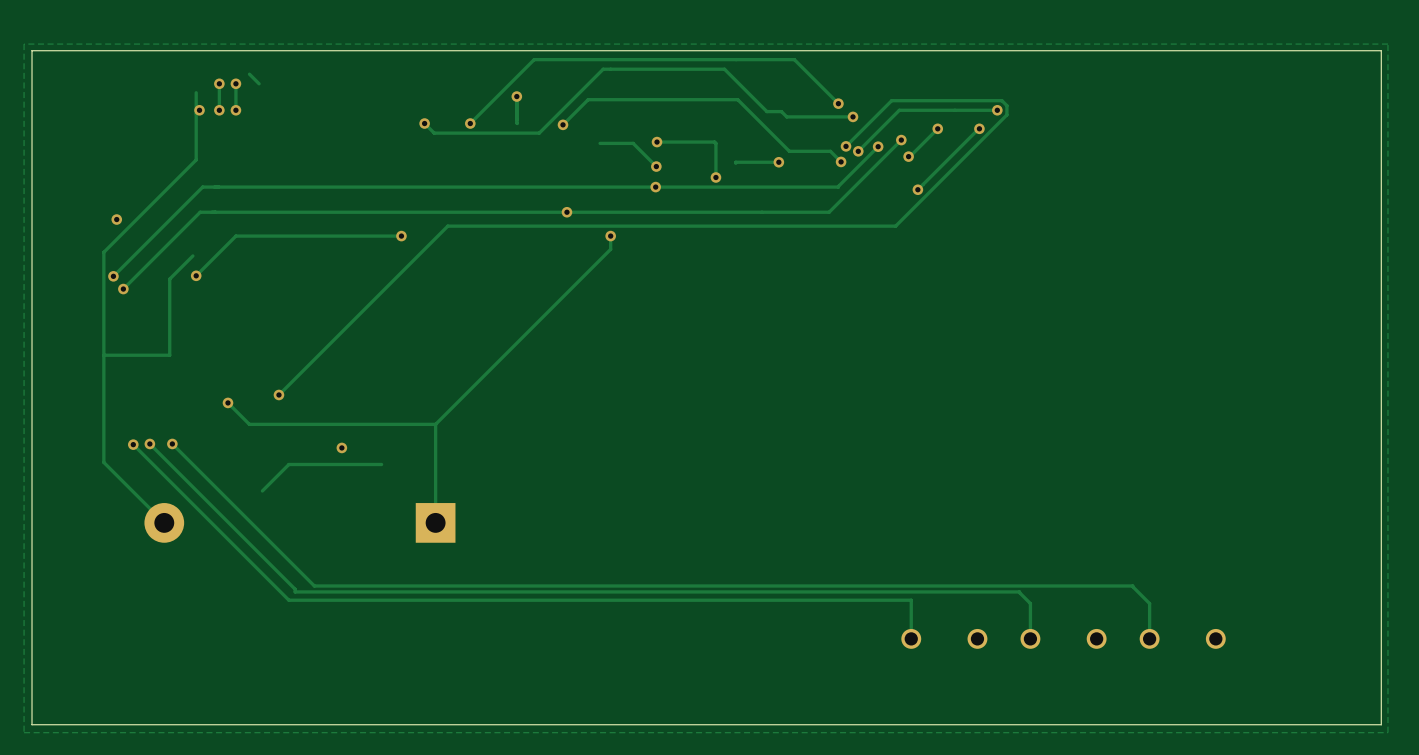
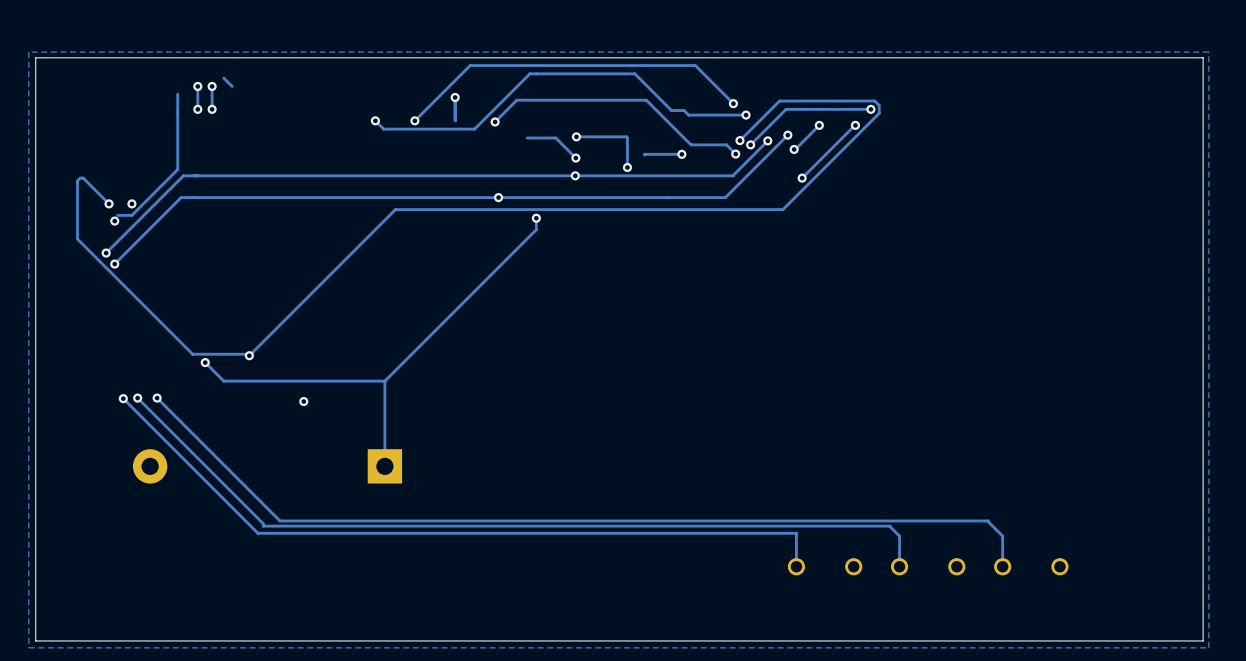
via: (199, 110) -> none
track: (196, 159) (103, 252) (103, 462) (164, 522) -> (177, 152) (177, 169) (131, 215) (117, 215)
track: none -> (109, 203) (83, 178) (77, 180) (77, 239) (192, 354) (249, 355)
via: none -> (131, 203)
track: (401, 236) (235, 236) (196, 275) -> none
via: (401, 236) -> none
via: none -> (114, 221)
track: (192, 255) (169, 279) (169, 355) (103, 355) -> none
via: (196, 275) -> none
track: (381, 464) (288, 464) (262, 490) -> none

